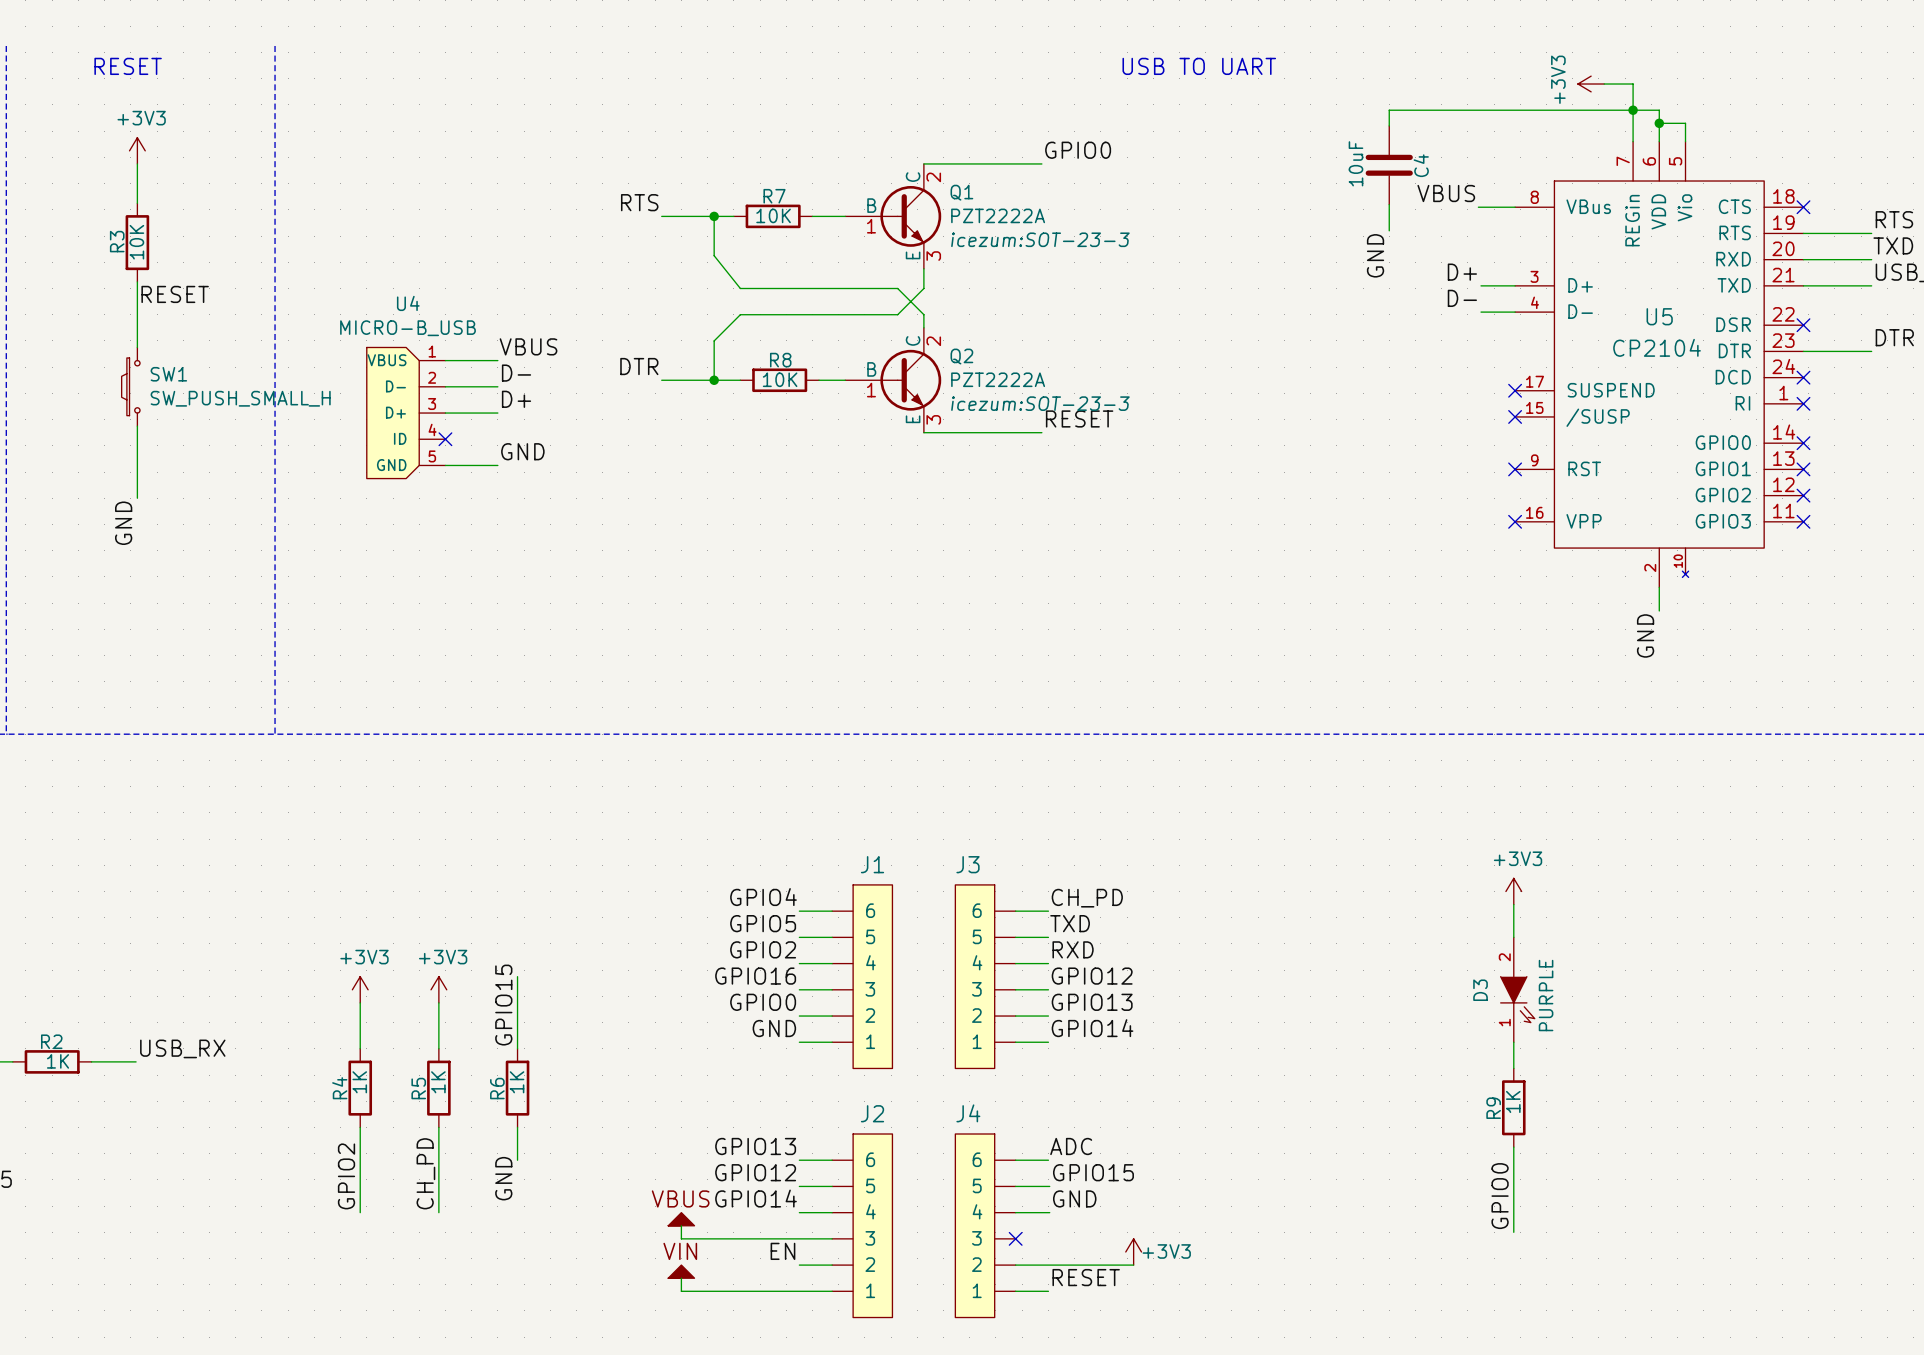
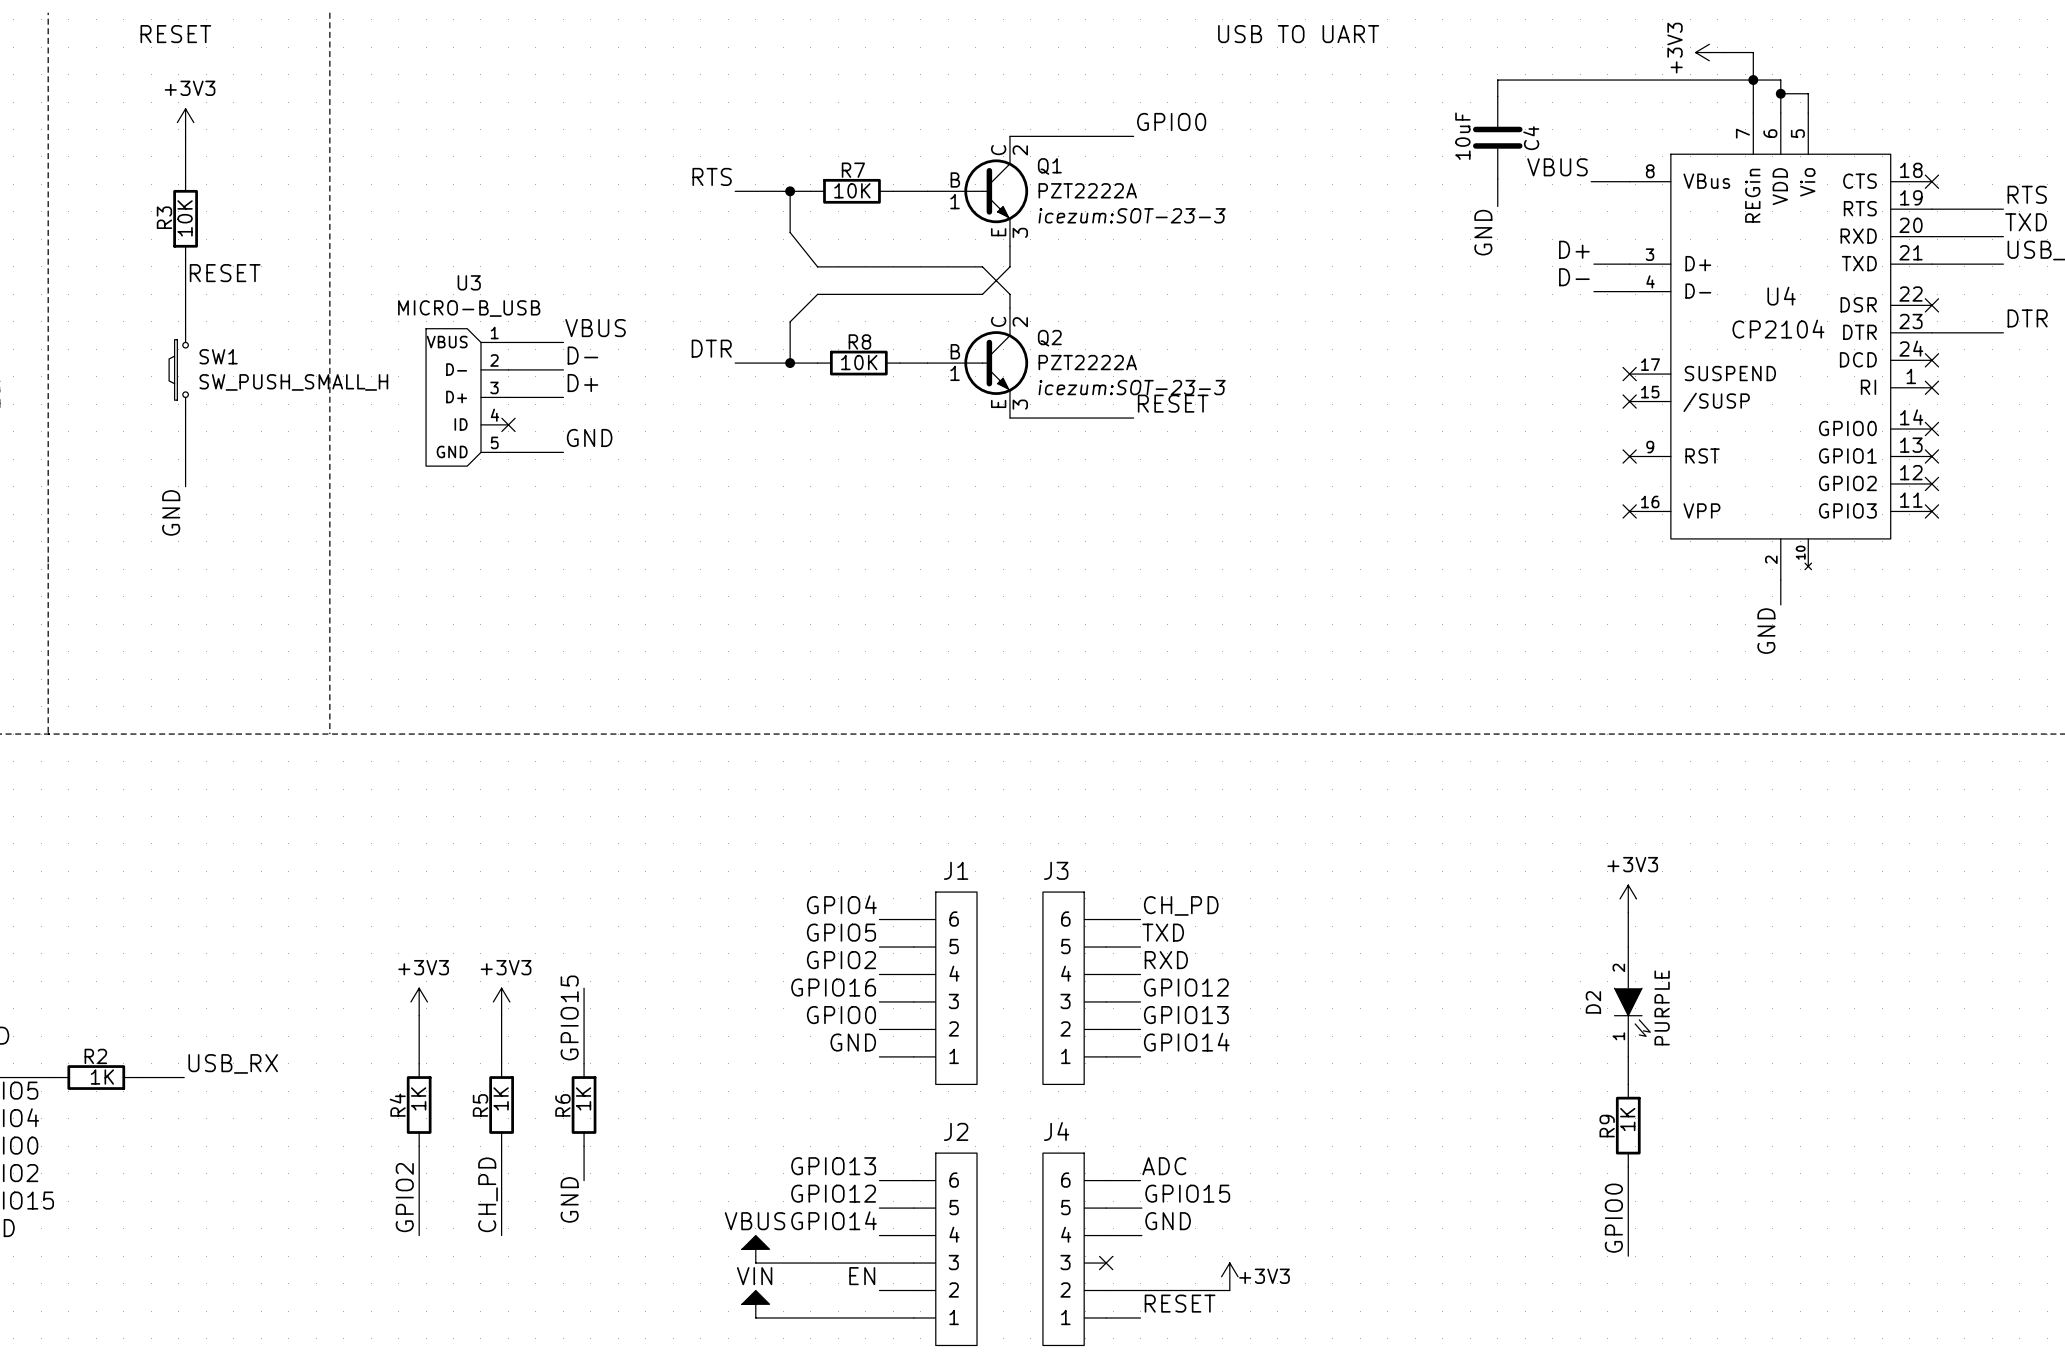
U4 name: U4 (408, 303) -> U3 (469, 282)
U5 name: U5 (1659, 316) -> U4 (1781, 296)
D3 name: D3 (1480, 990) -> D2 (1593, 1002)

